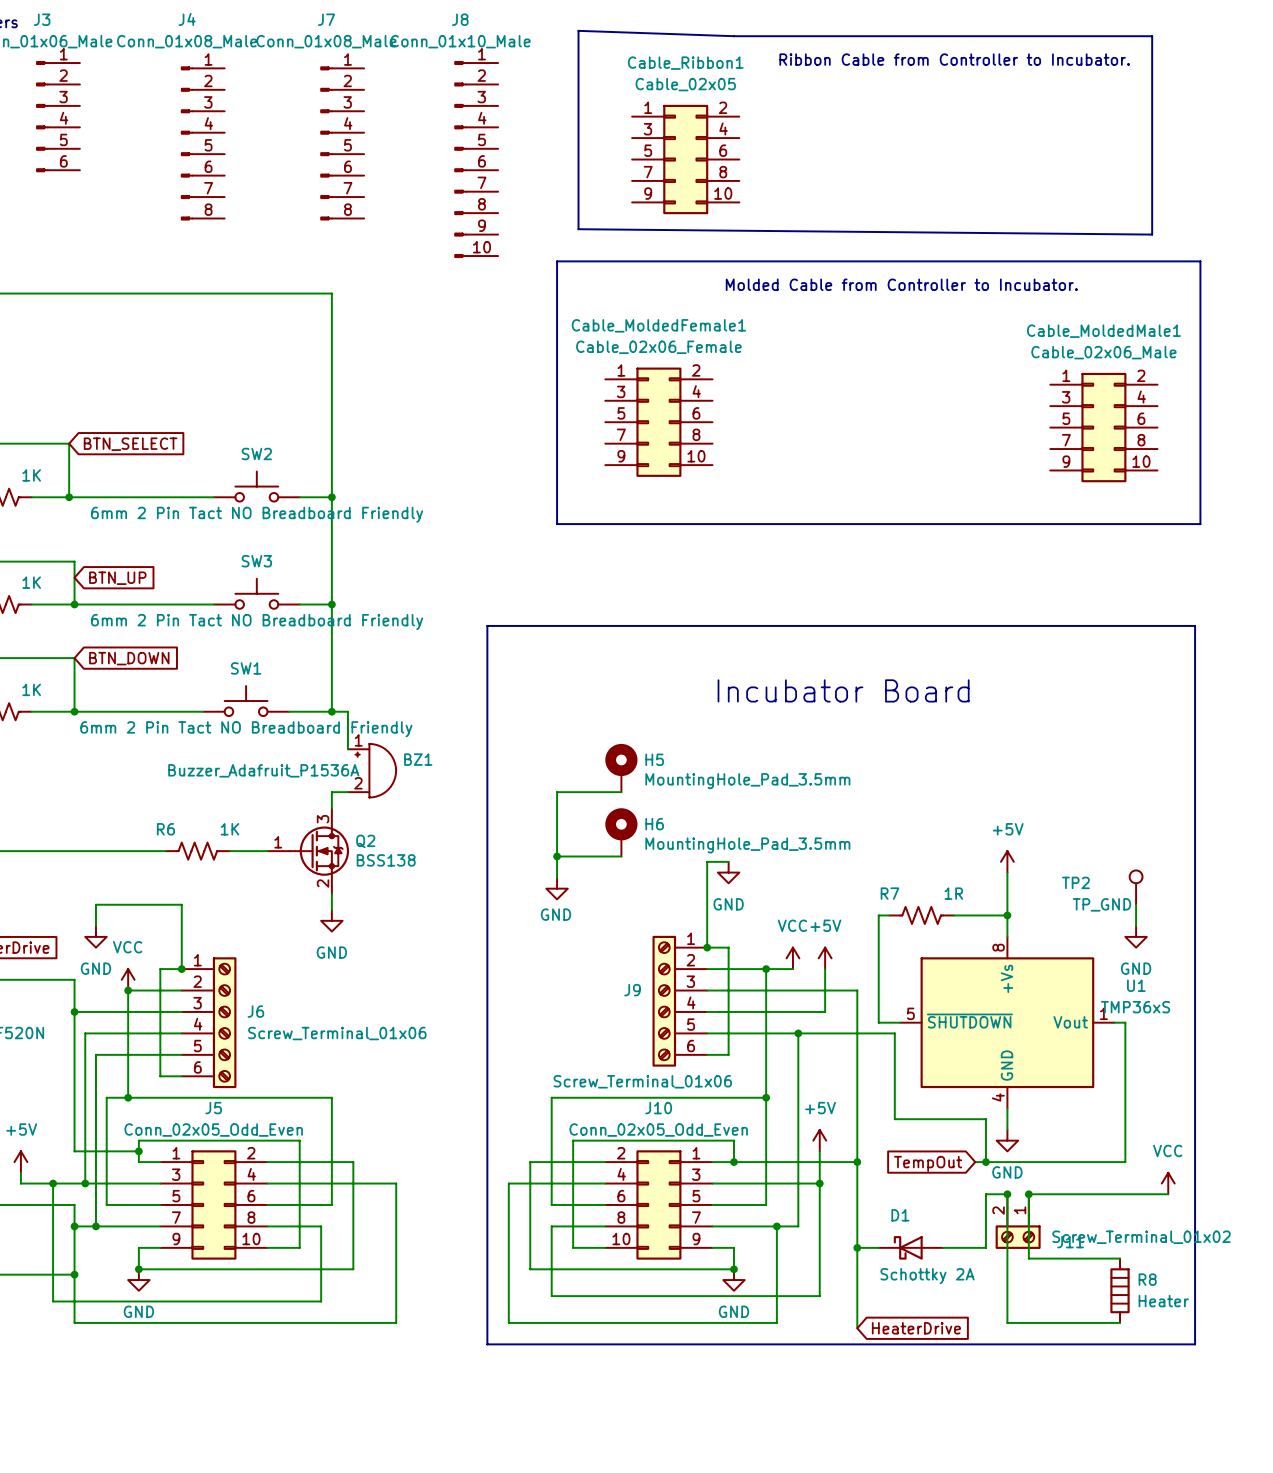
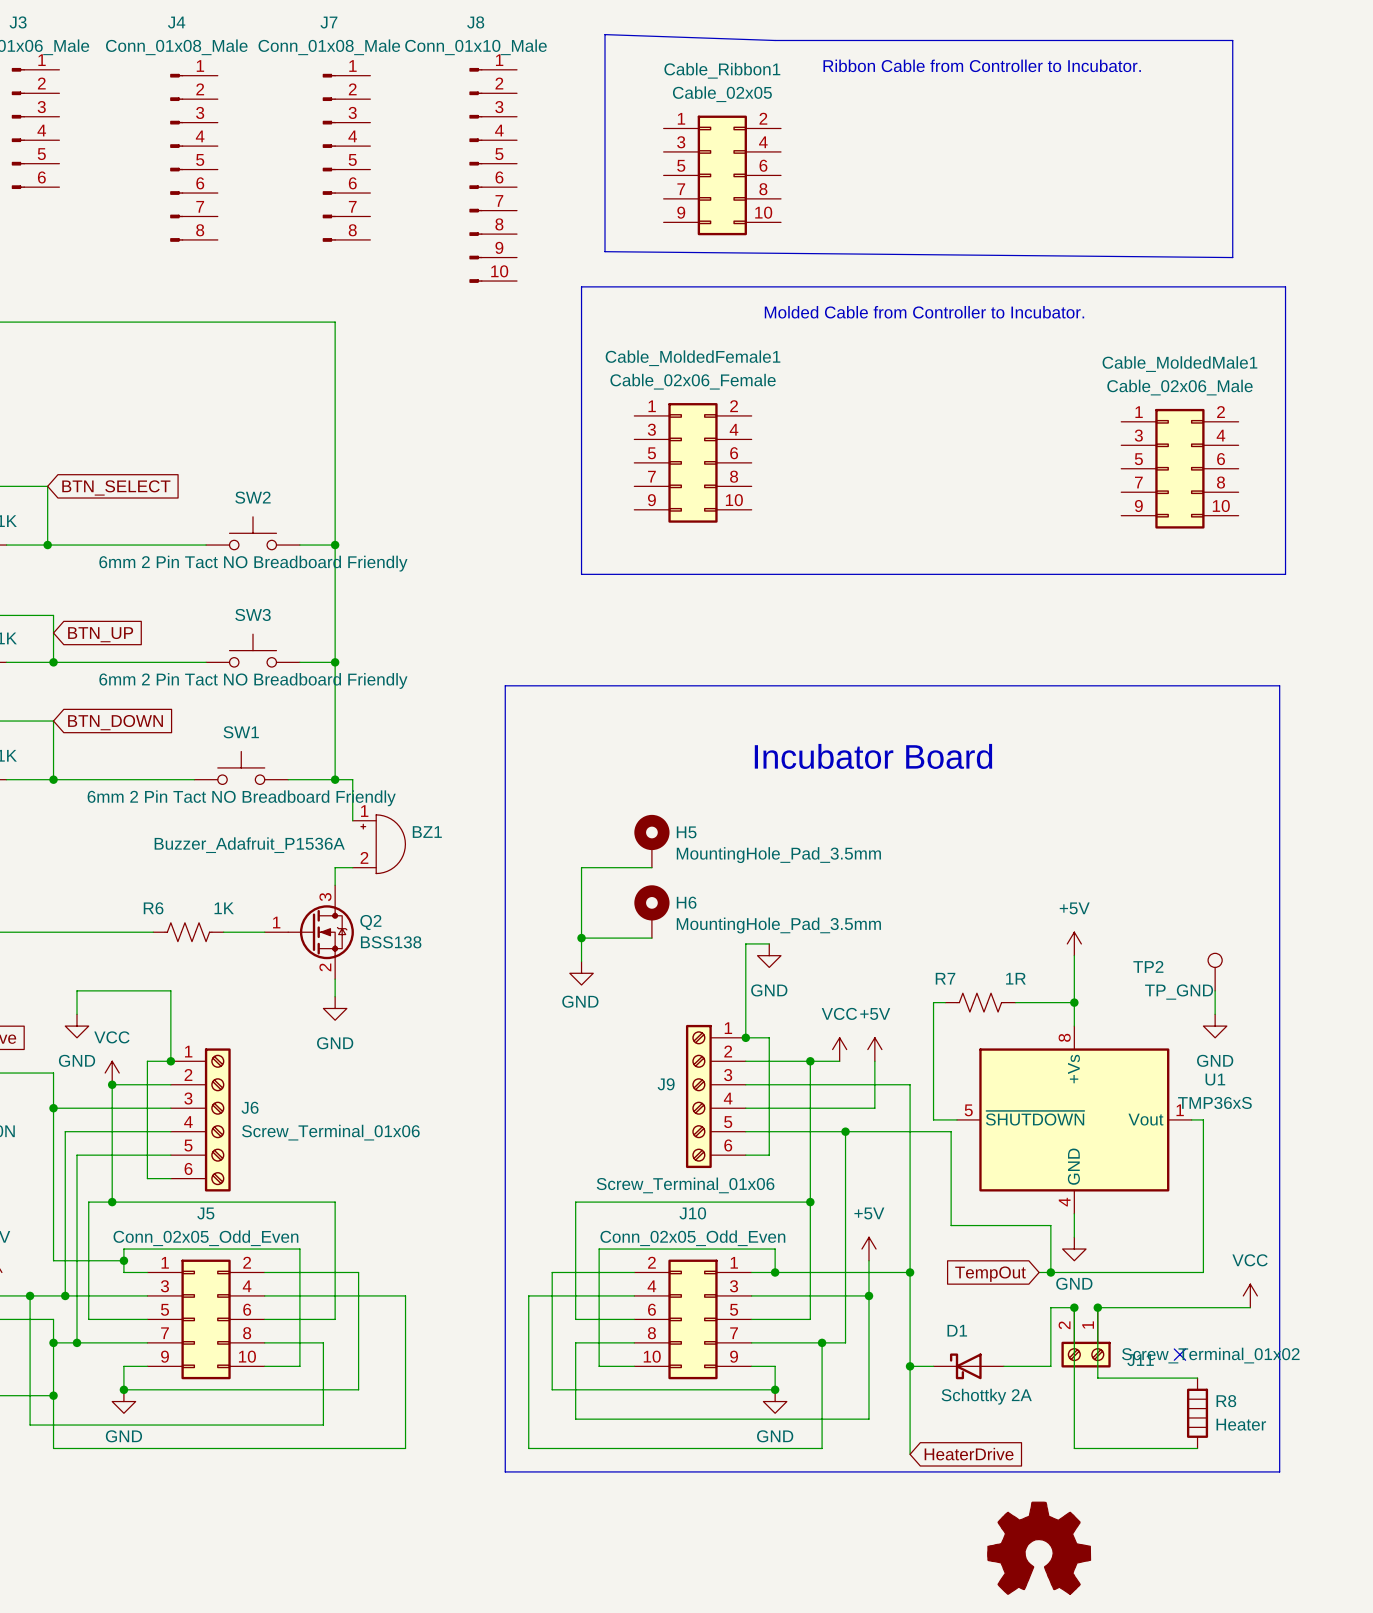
no-connect mark: none -> (1179, 1354)
power symbol: none -> (1039, 1548)

